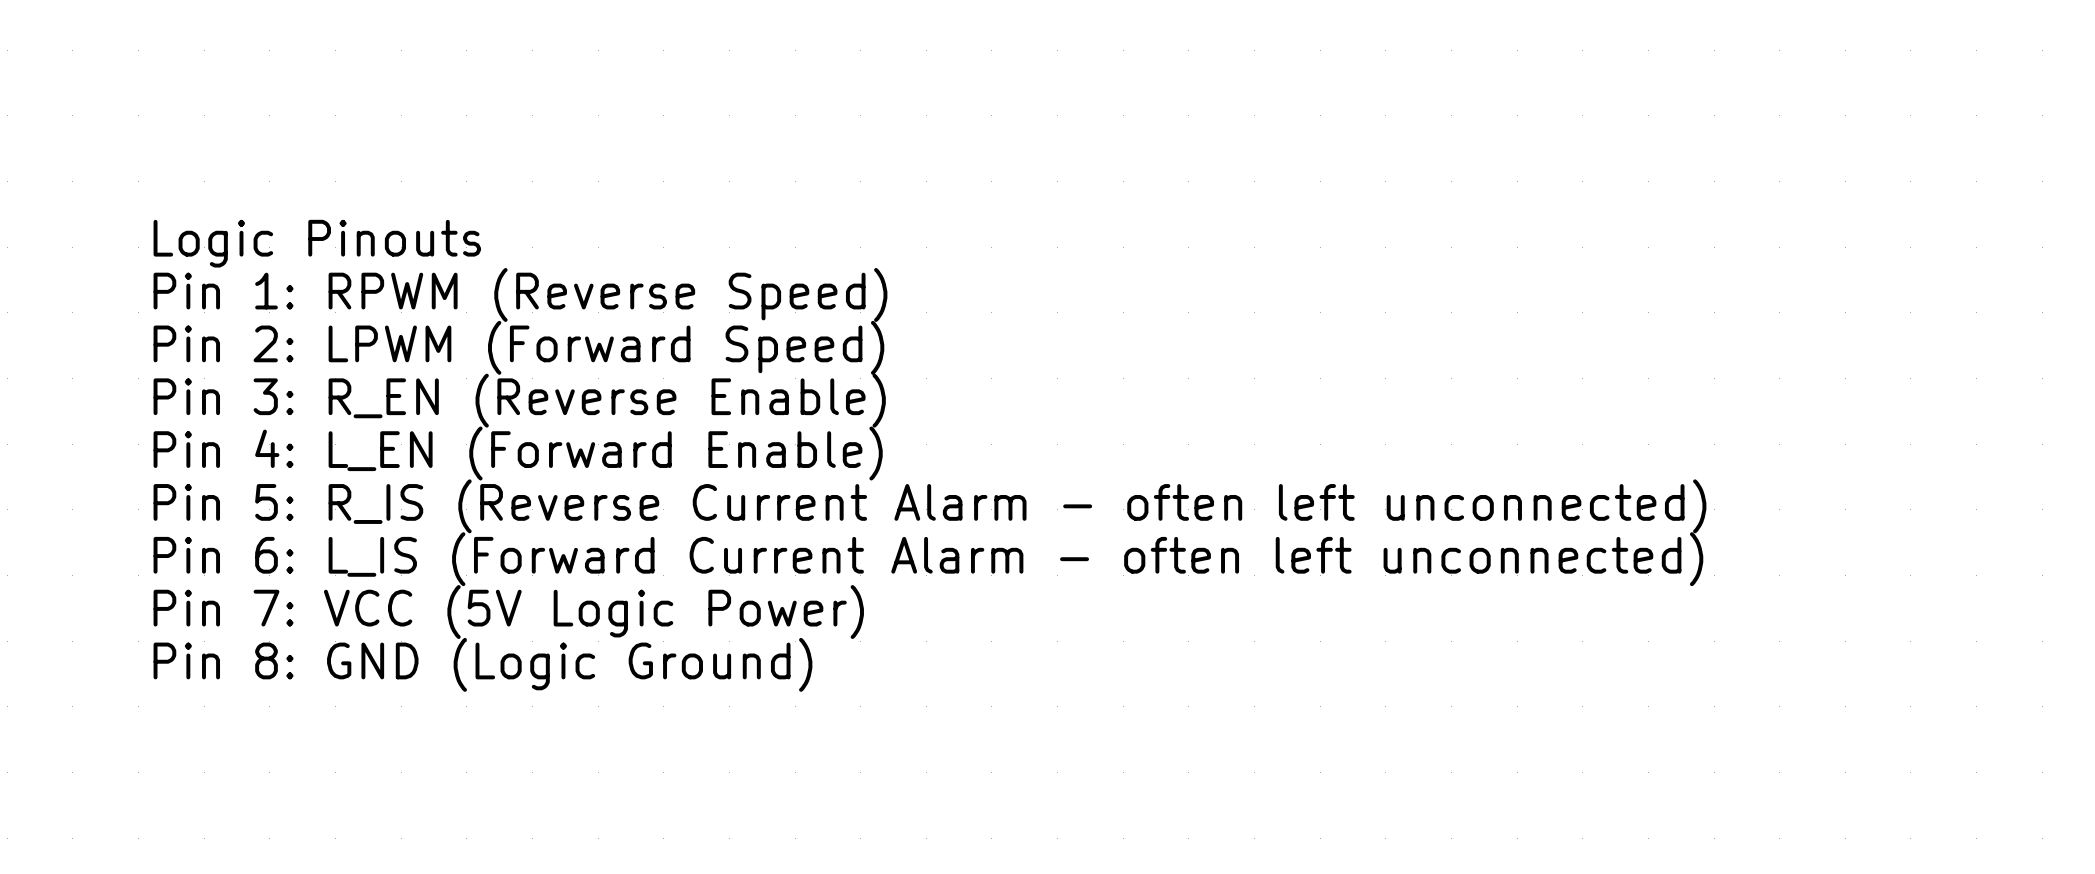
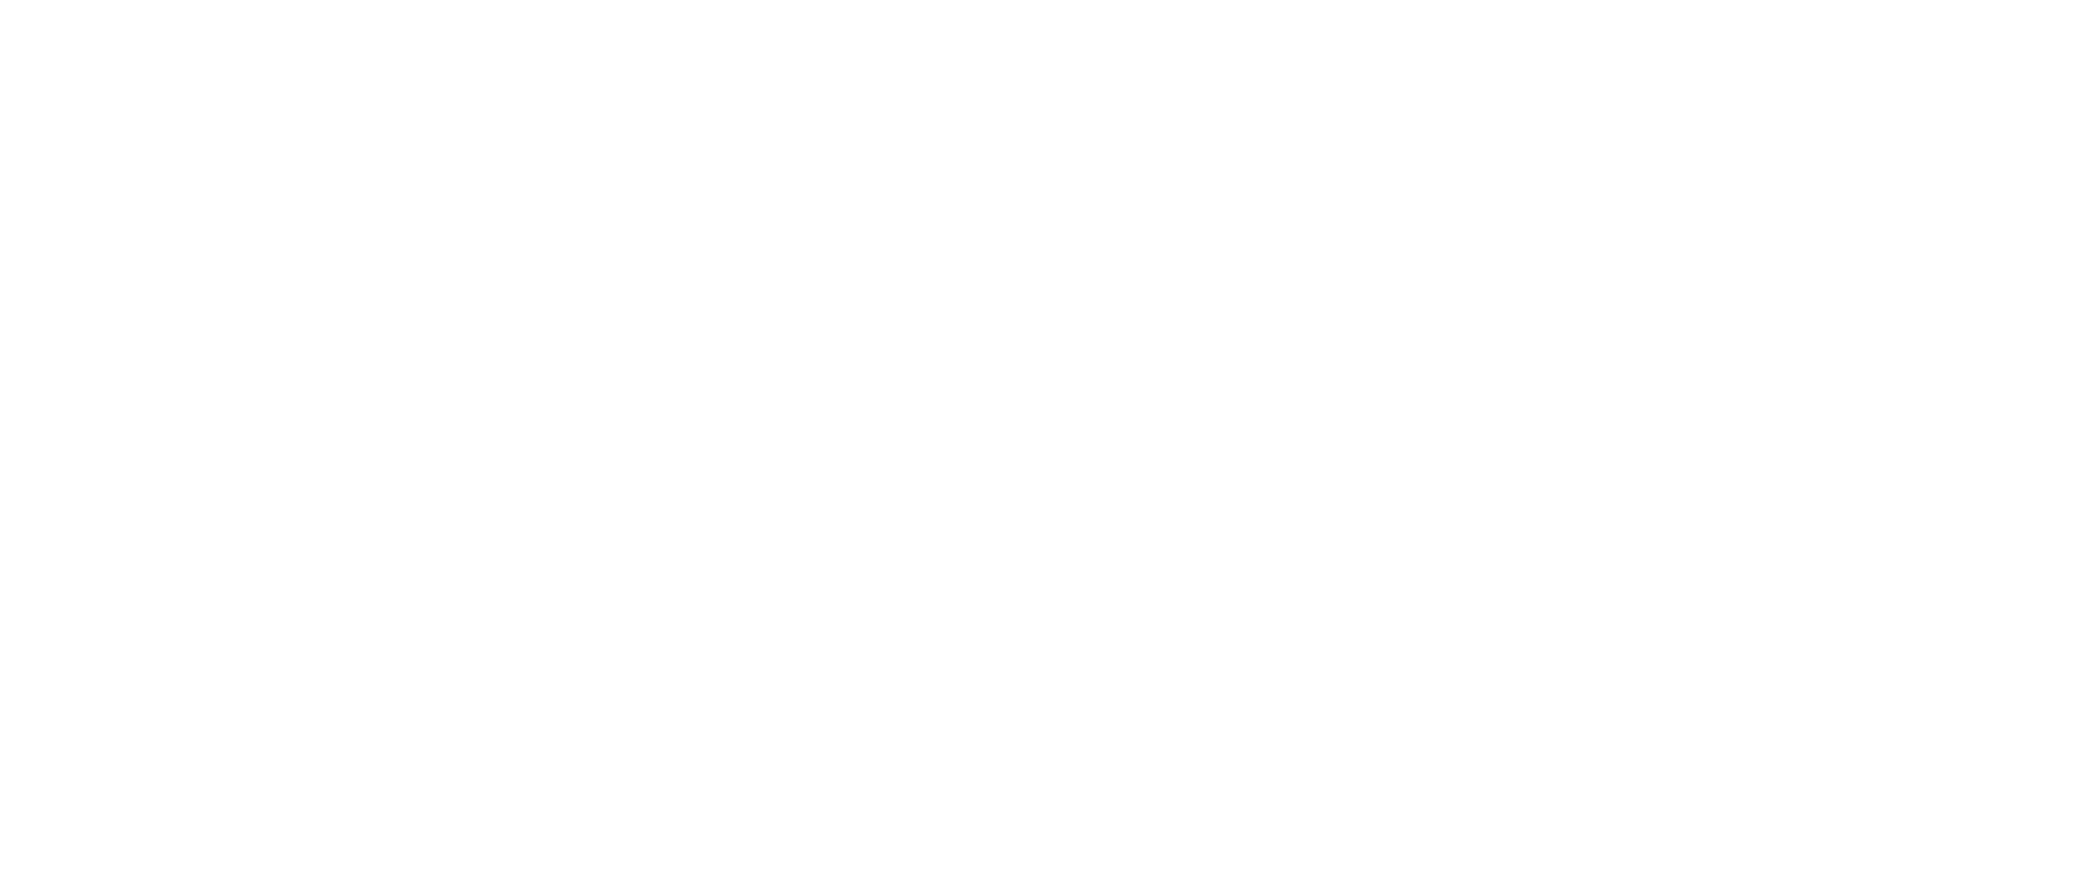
text: Logic Pinouts (317, 243) -> none
text: Pin 1: RPWM (Reverse Speed) (520, 294) -> none
text: Pin 2: LPWM (Forward Speed) (518, 347) -> none
text: Pin 3: R_EN (Reverse Enable) (519, 400) -> none
text: Pin 4: L_EN (Forward Enable) (518, 453) -> none
text: Pin 5: R_IS (Reverse Current Alarm - often left unconnected) (929, 506) -> none
text: Pin 6: L_IS (Forward Current Alarm - often left unconnected) (928, 559) -> none
text: Pin 7: VCC (5V Logic Power) (508, 612) -> none
text: Pin 8: GND (Logic Ground) (482, 664) -> none

